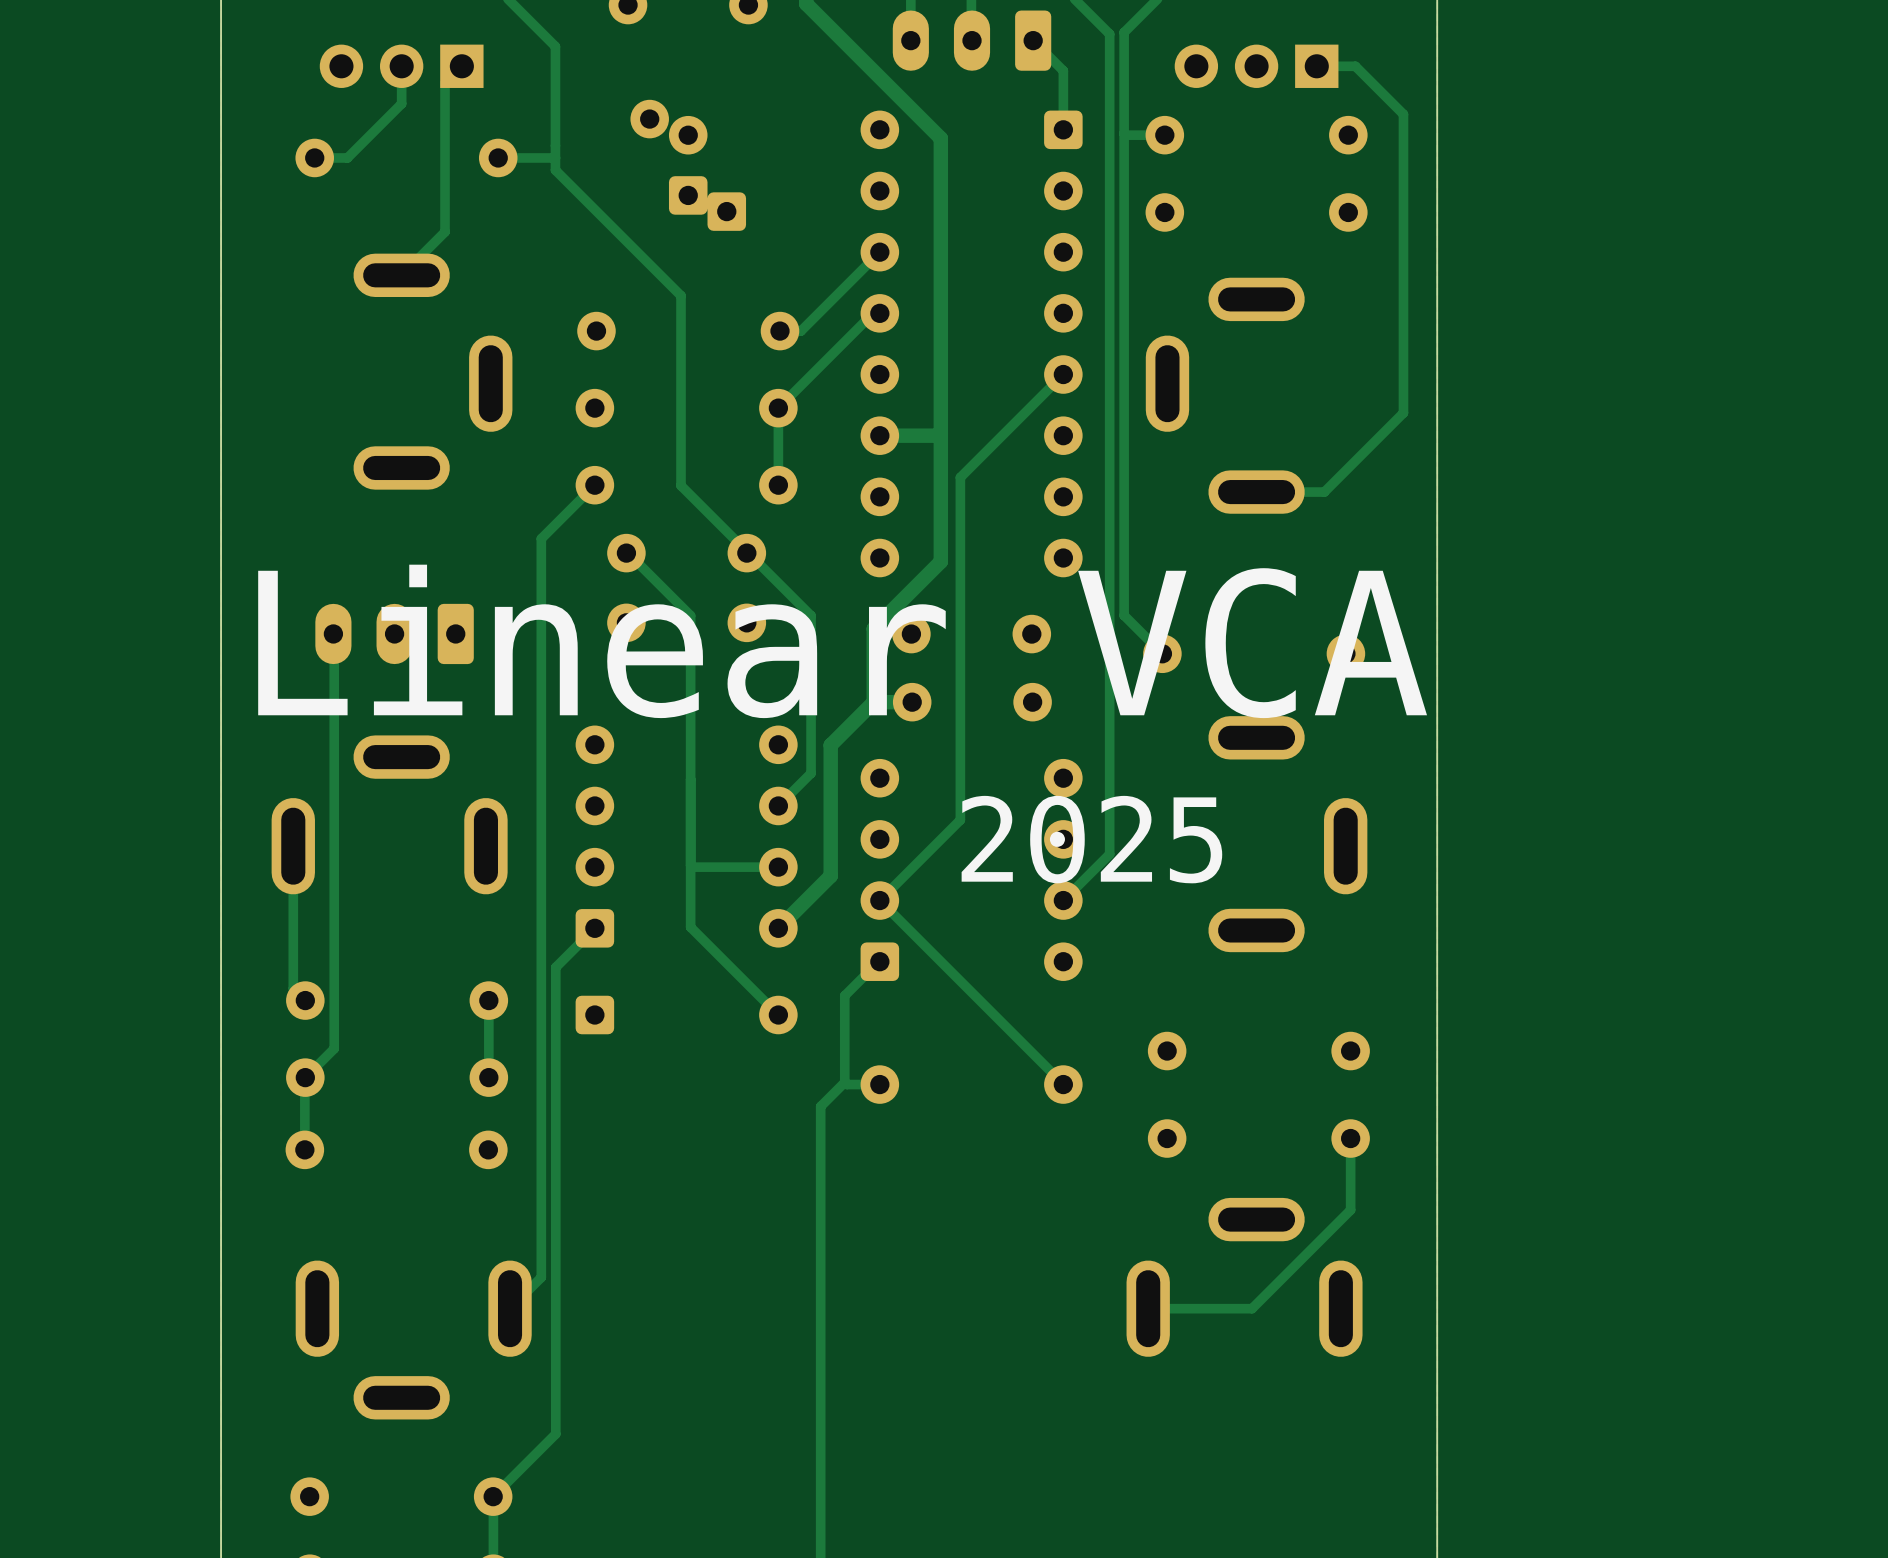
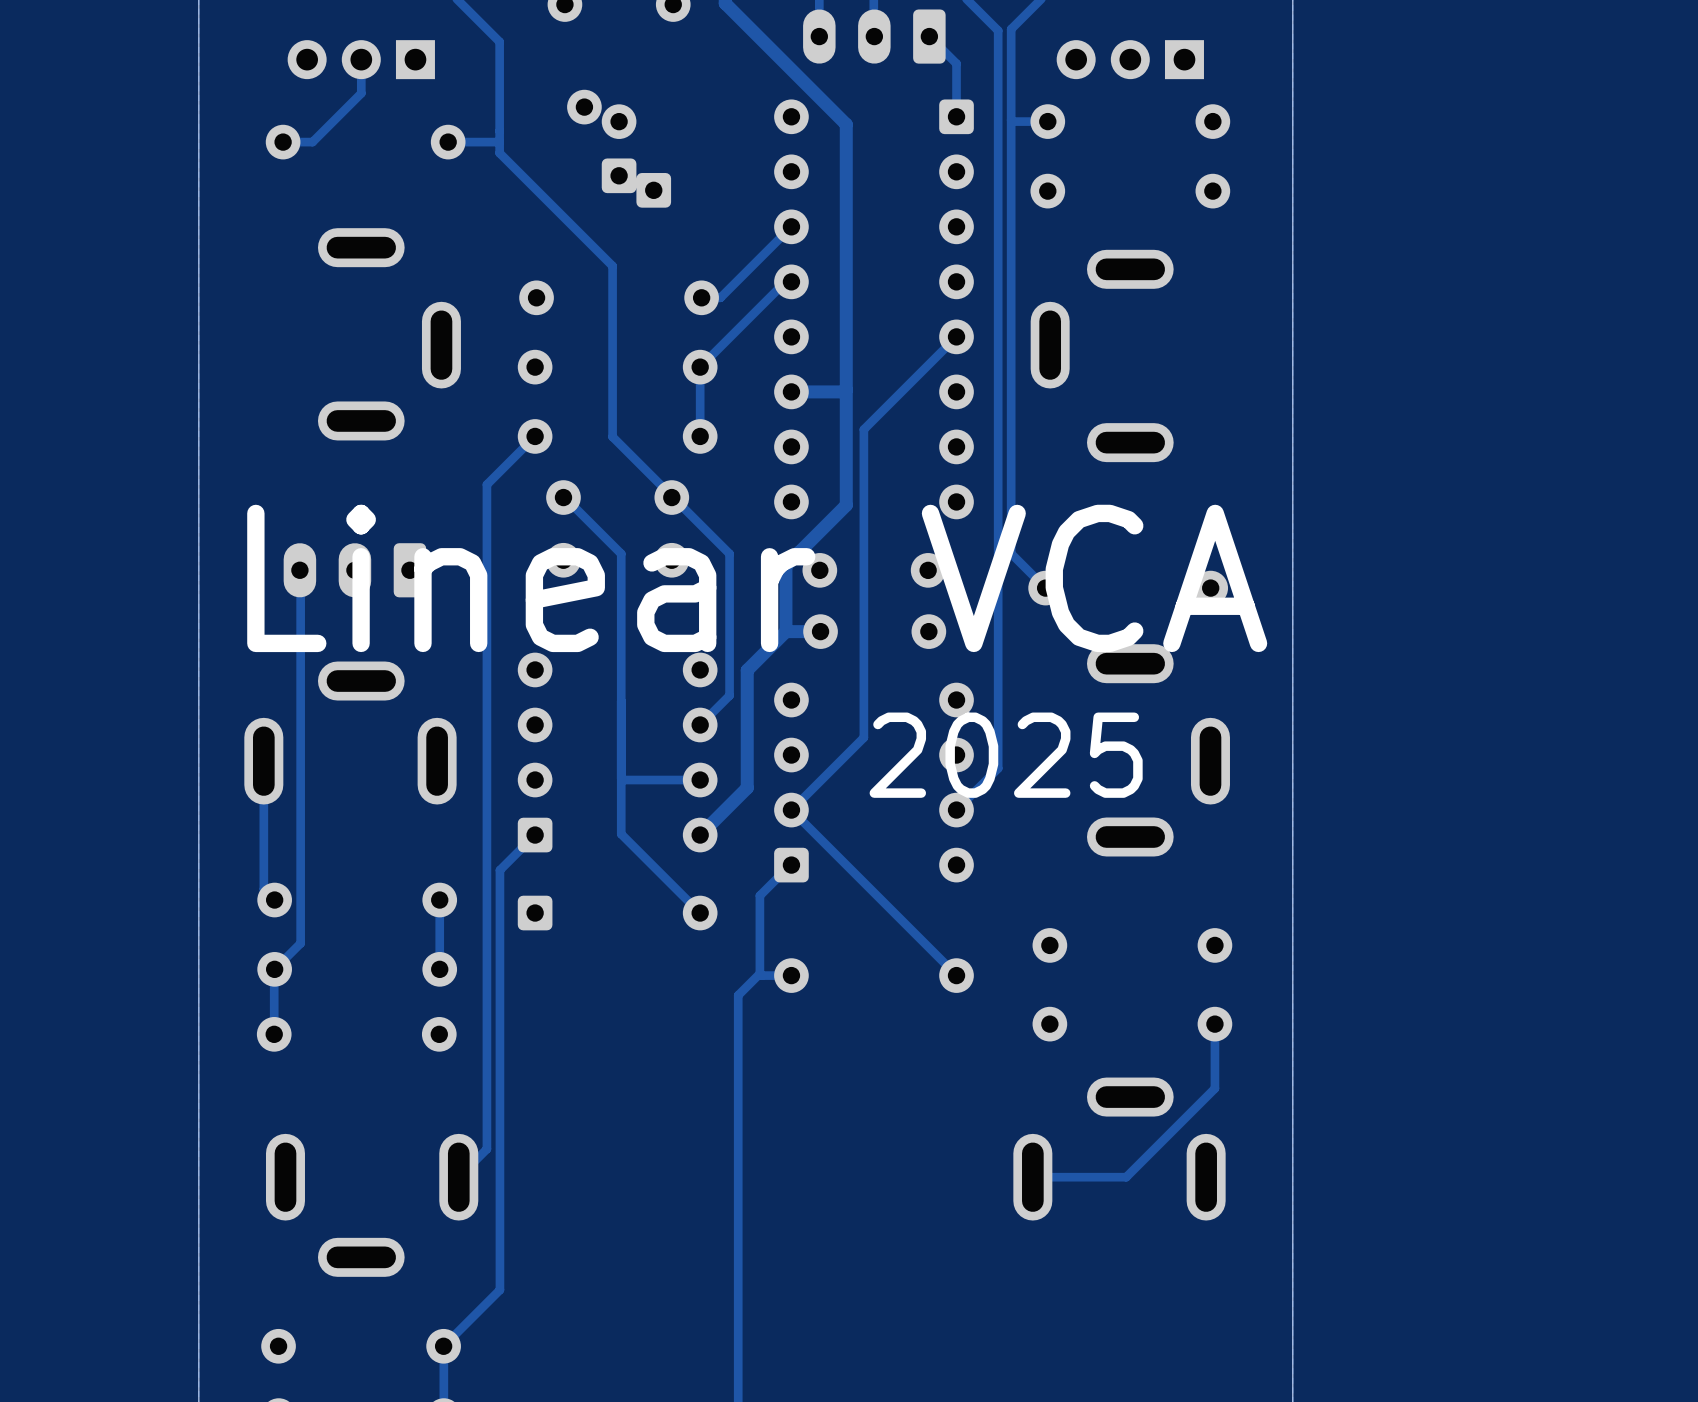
track: (1316, 66) (1355, 66) (1403, 114) (1403, 412) (1324, 492) (1256, 492) -> none
track: (445, 83) (445, 231) (401, 275) -> none

